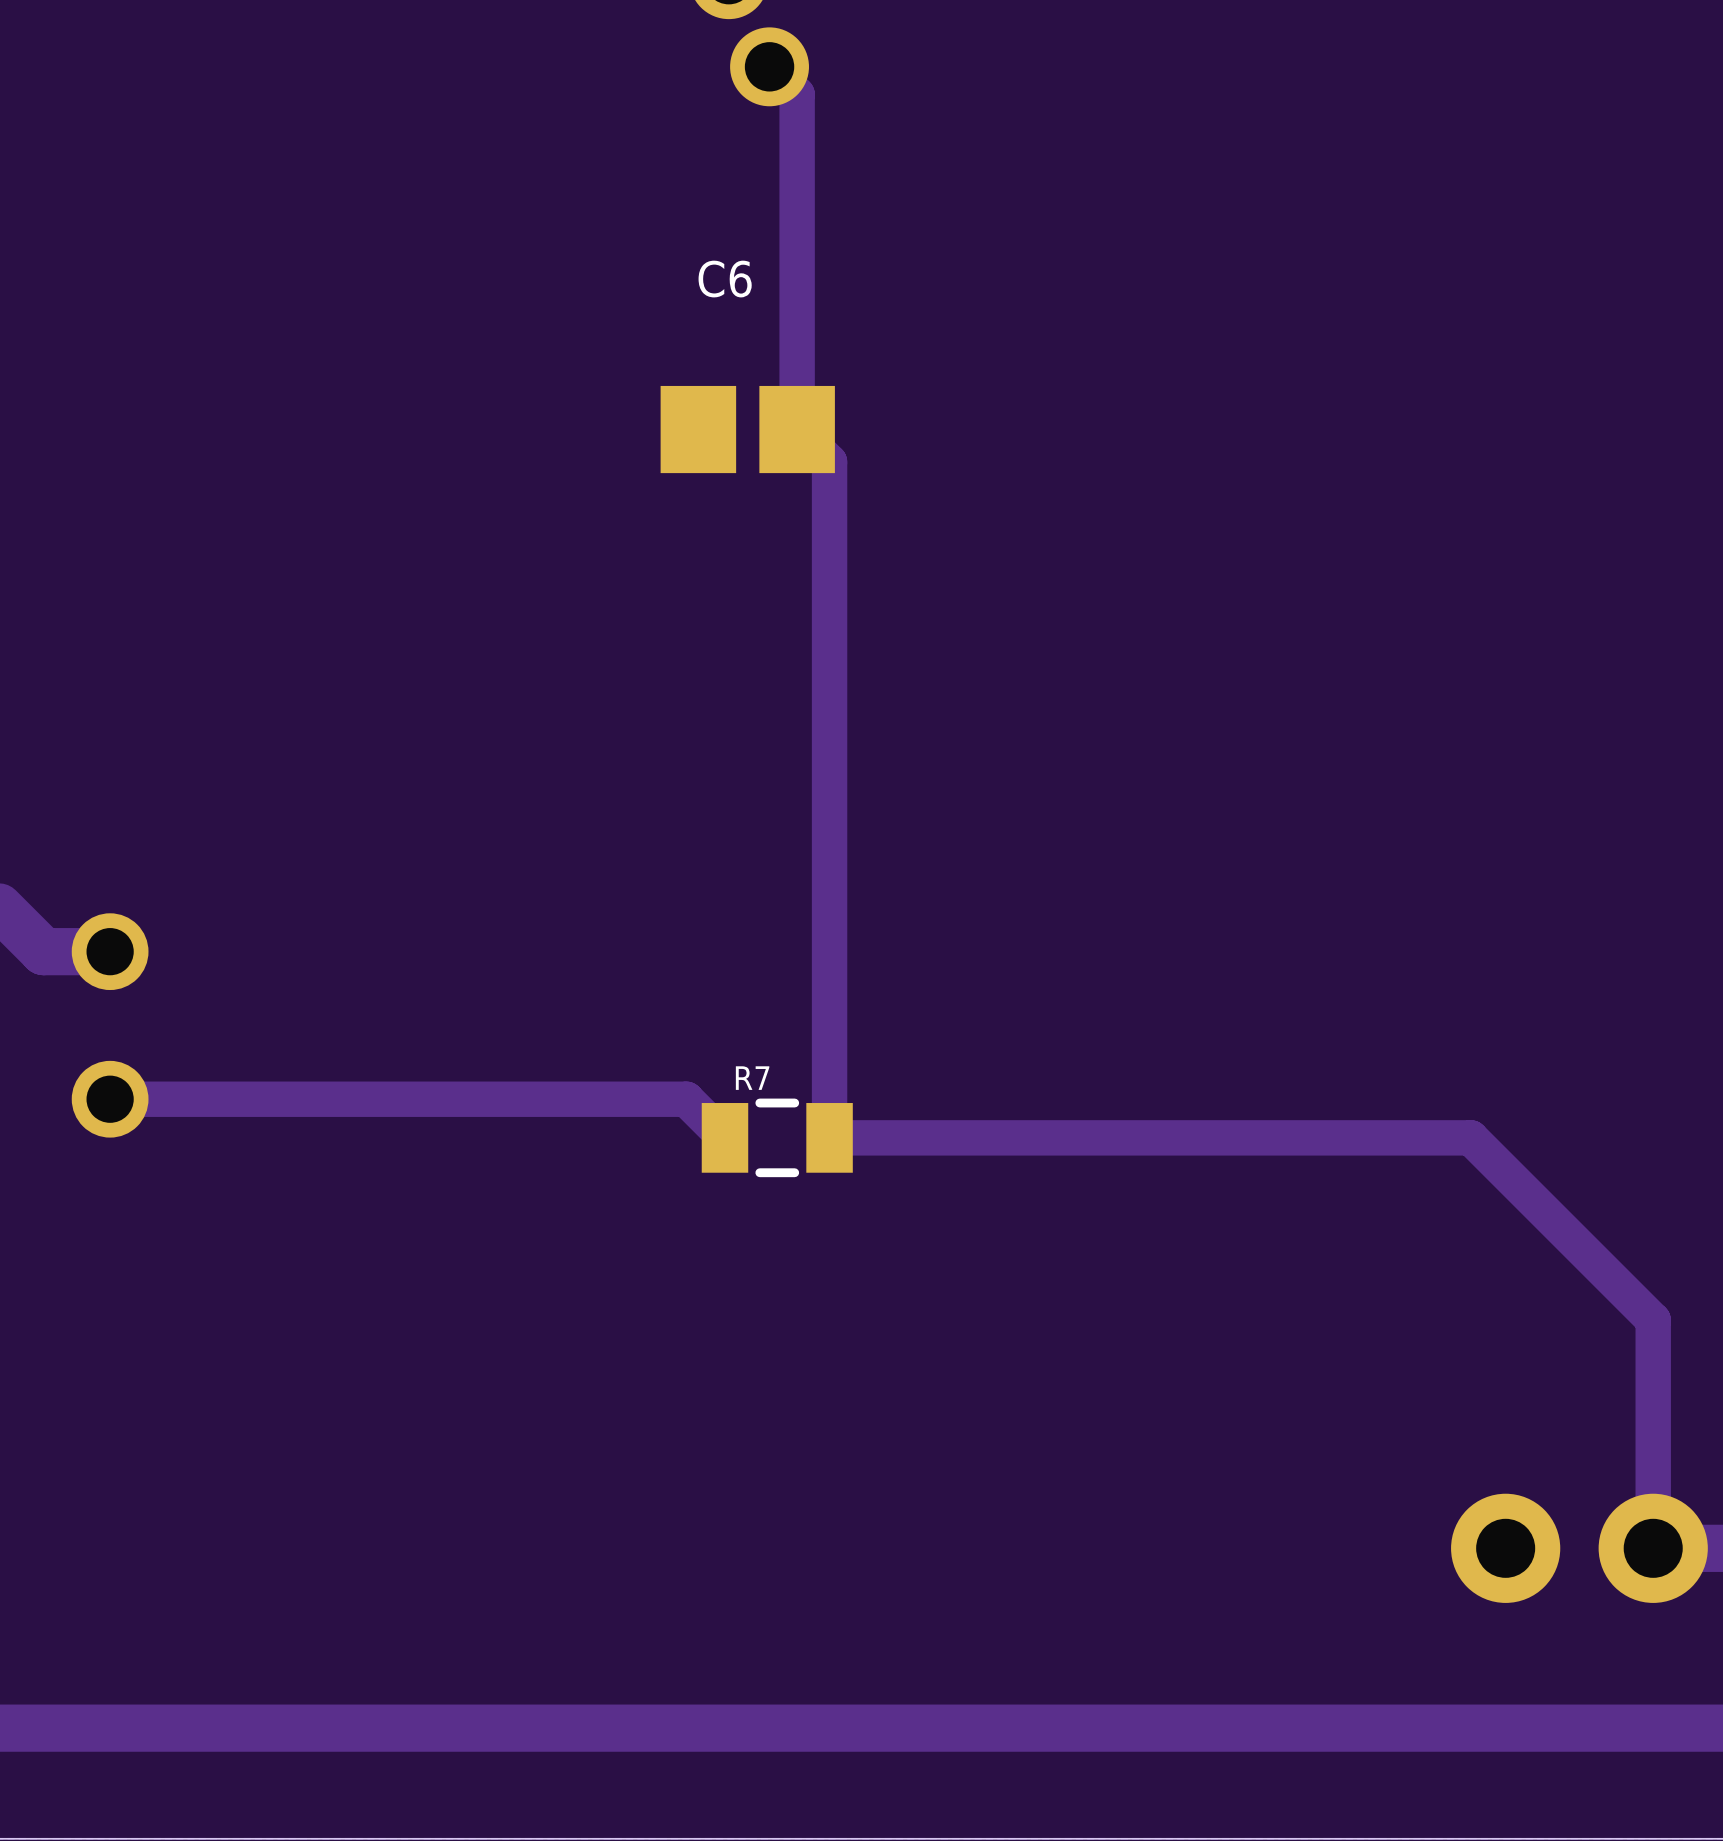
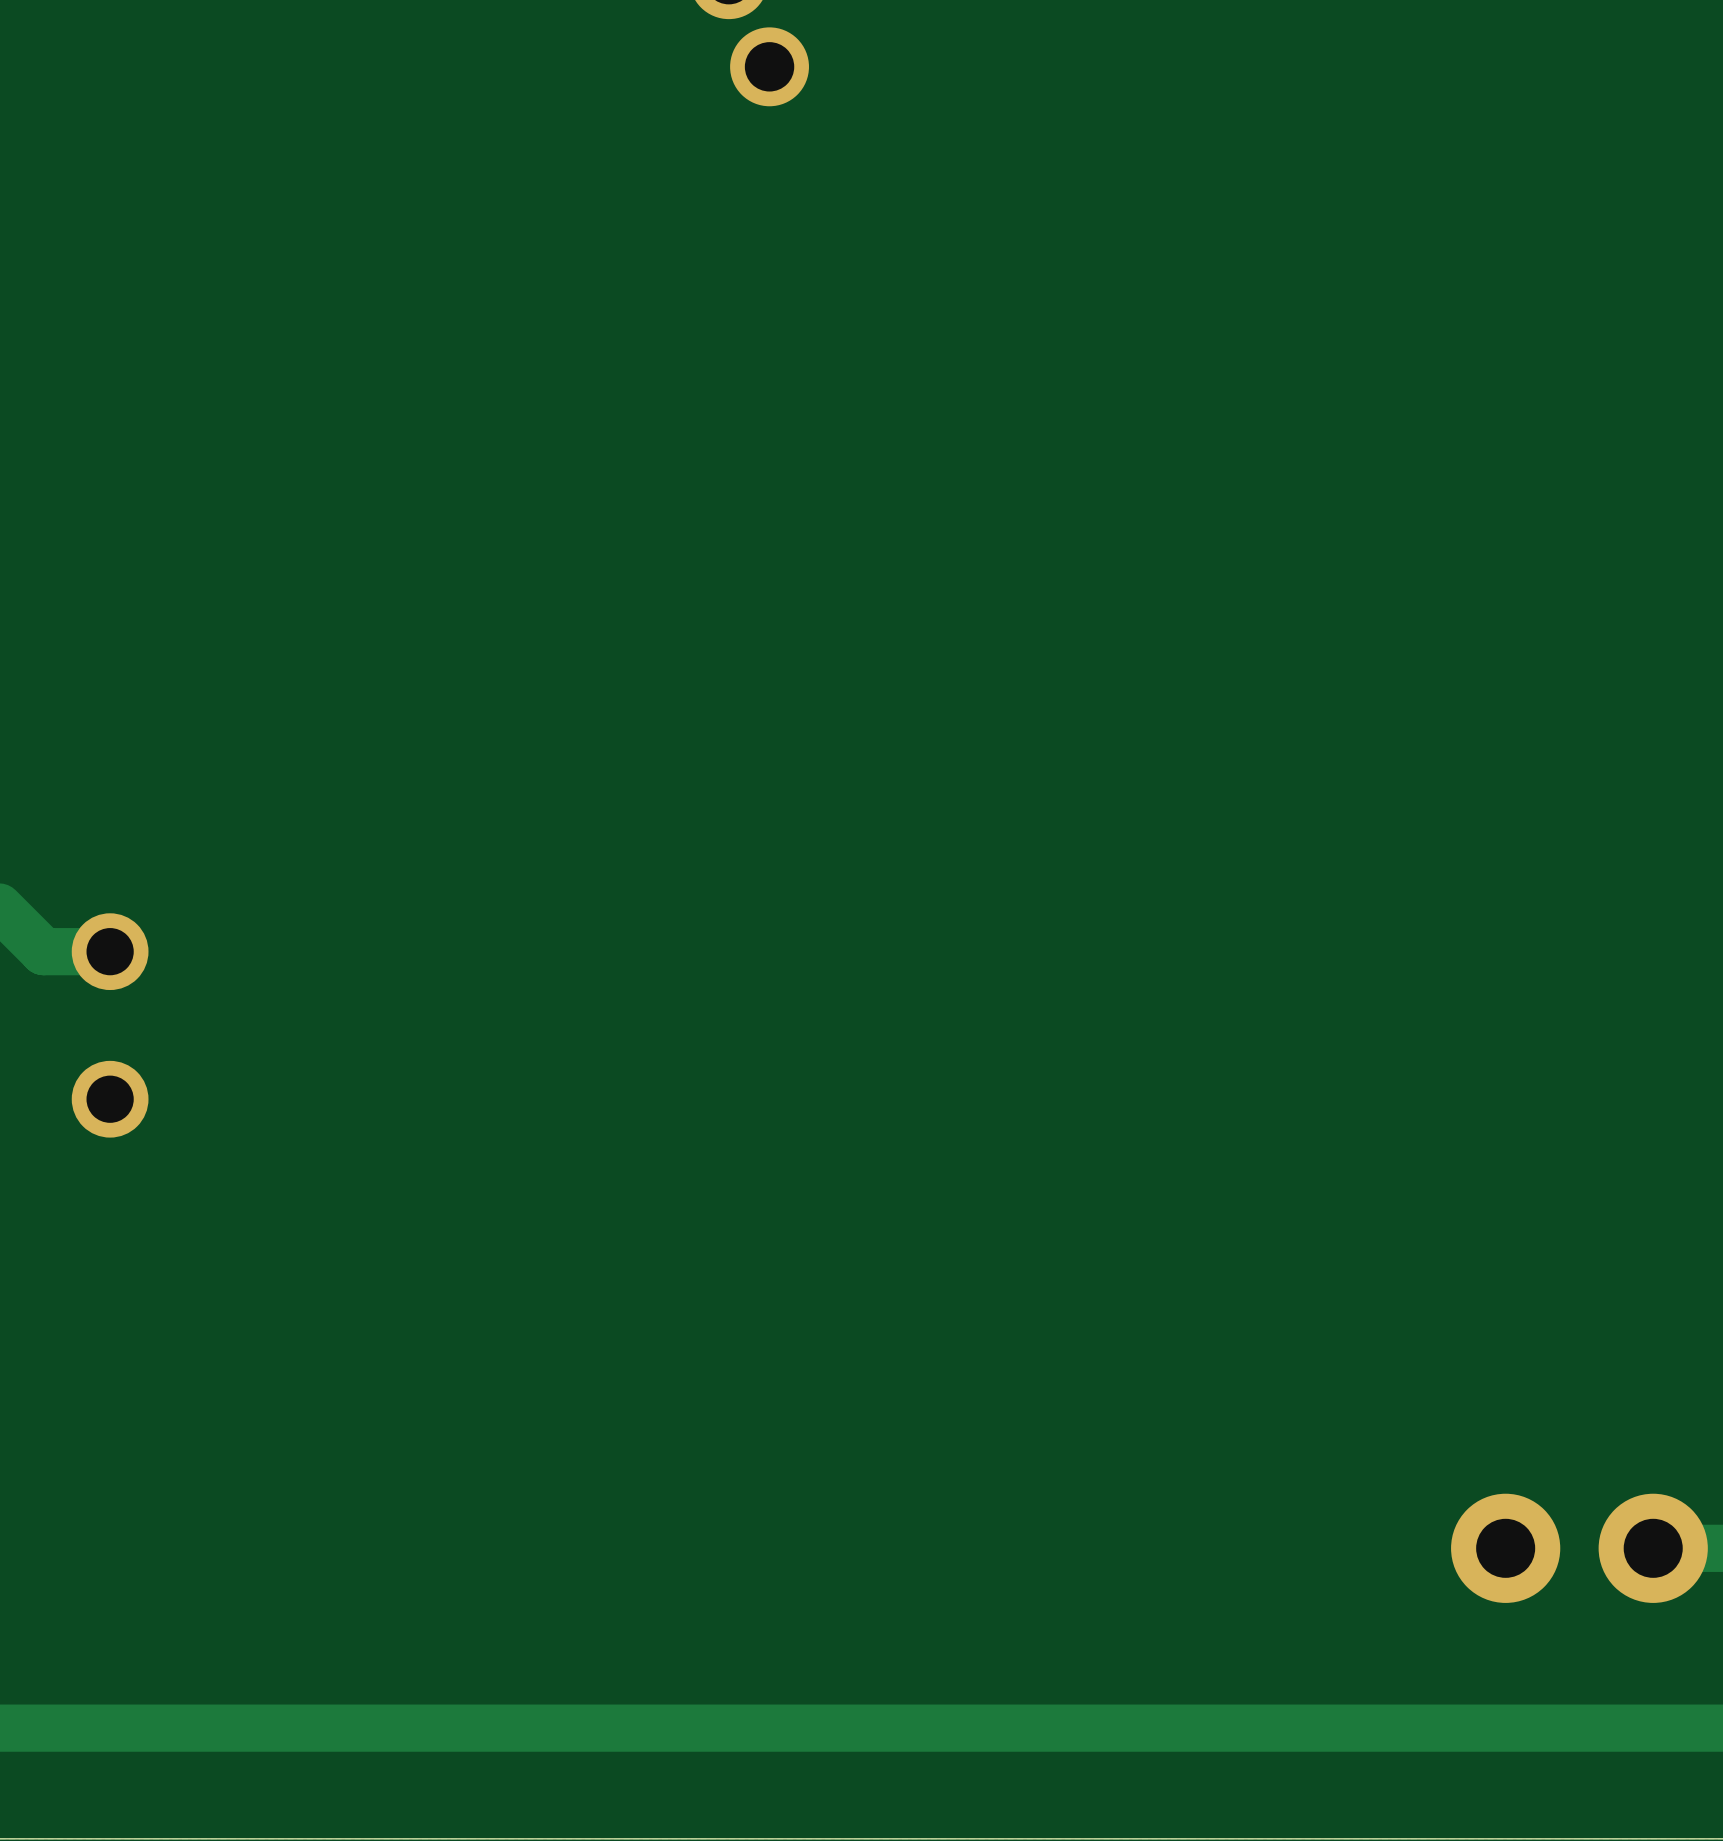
track: (769, 66) (797, 94) (797, 429) (829, 461) (829, 1137) (1470, 1137) (1653, 1320) (1653, 1548) -> none
C6: (747, 429) -> none
track: (110, 1099) (686, 1099) (724, 1137) -> none
R7: (777, 1137) -> none

